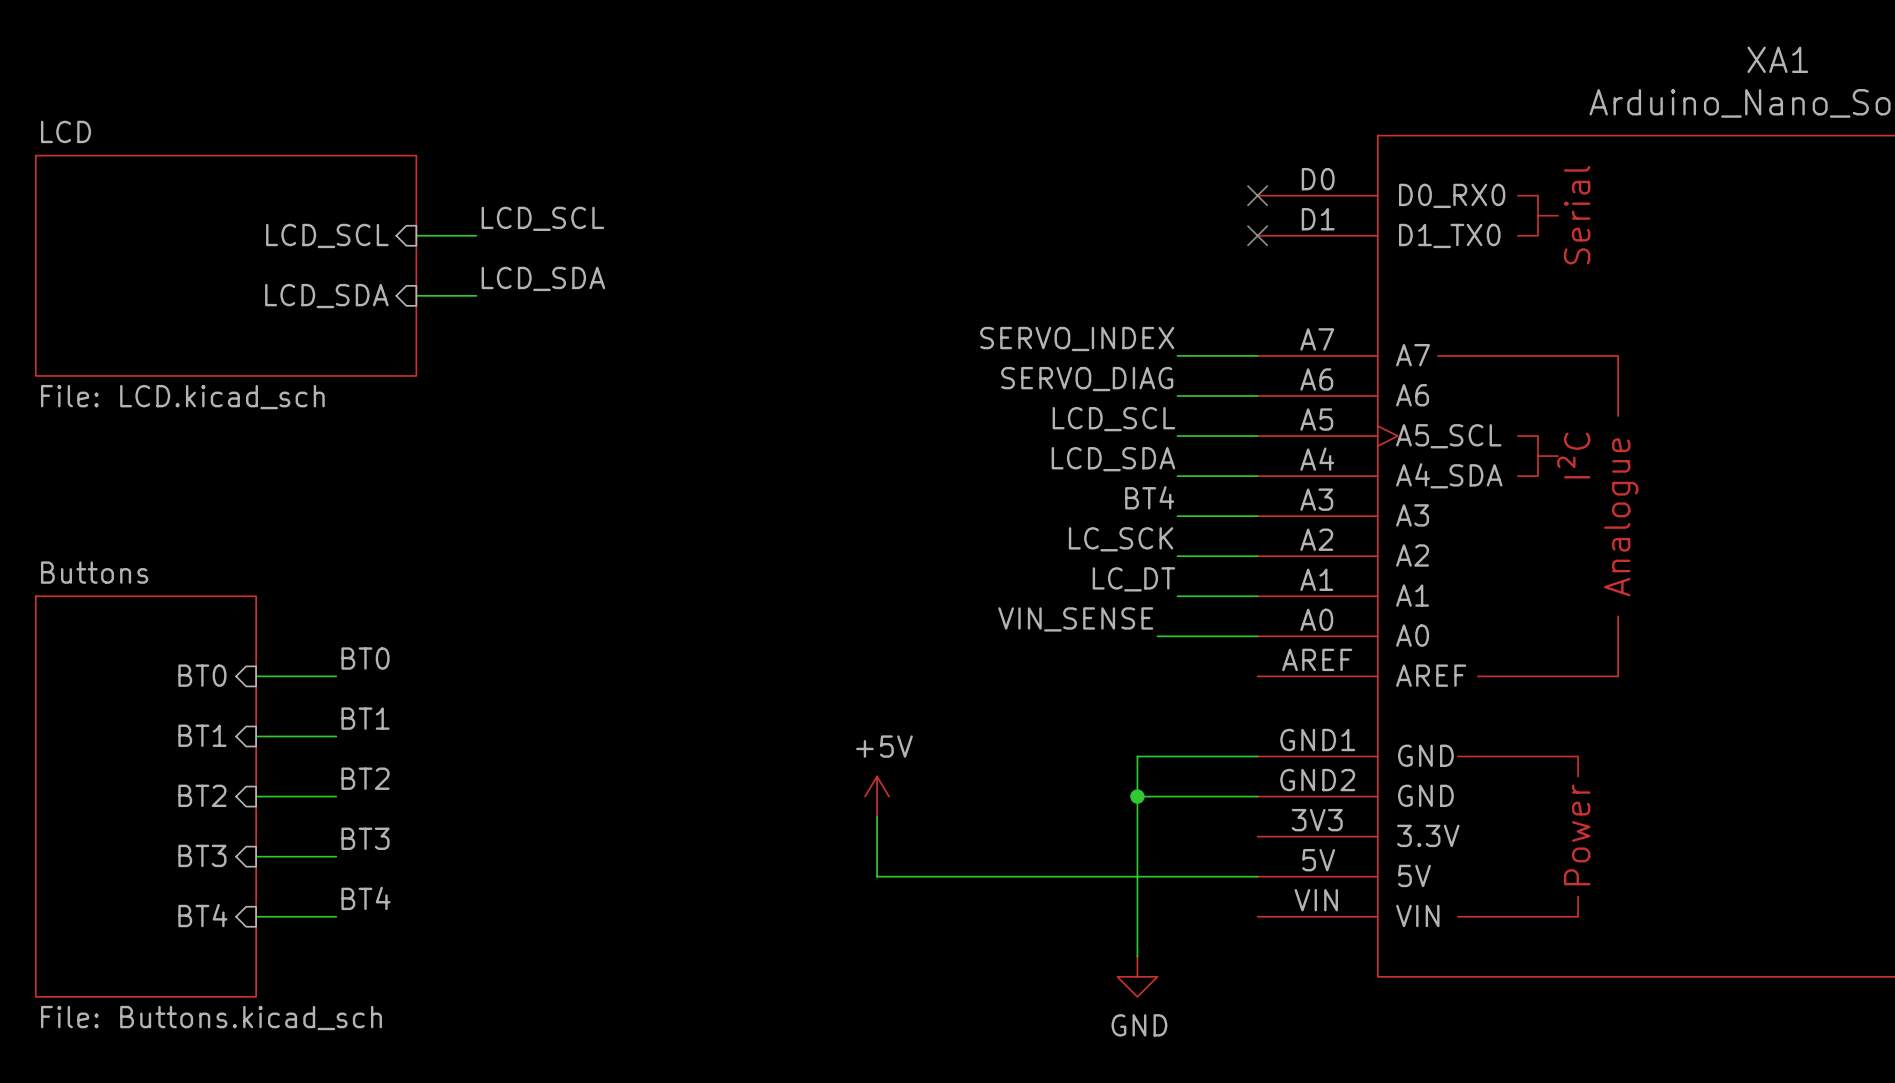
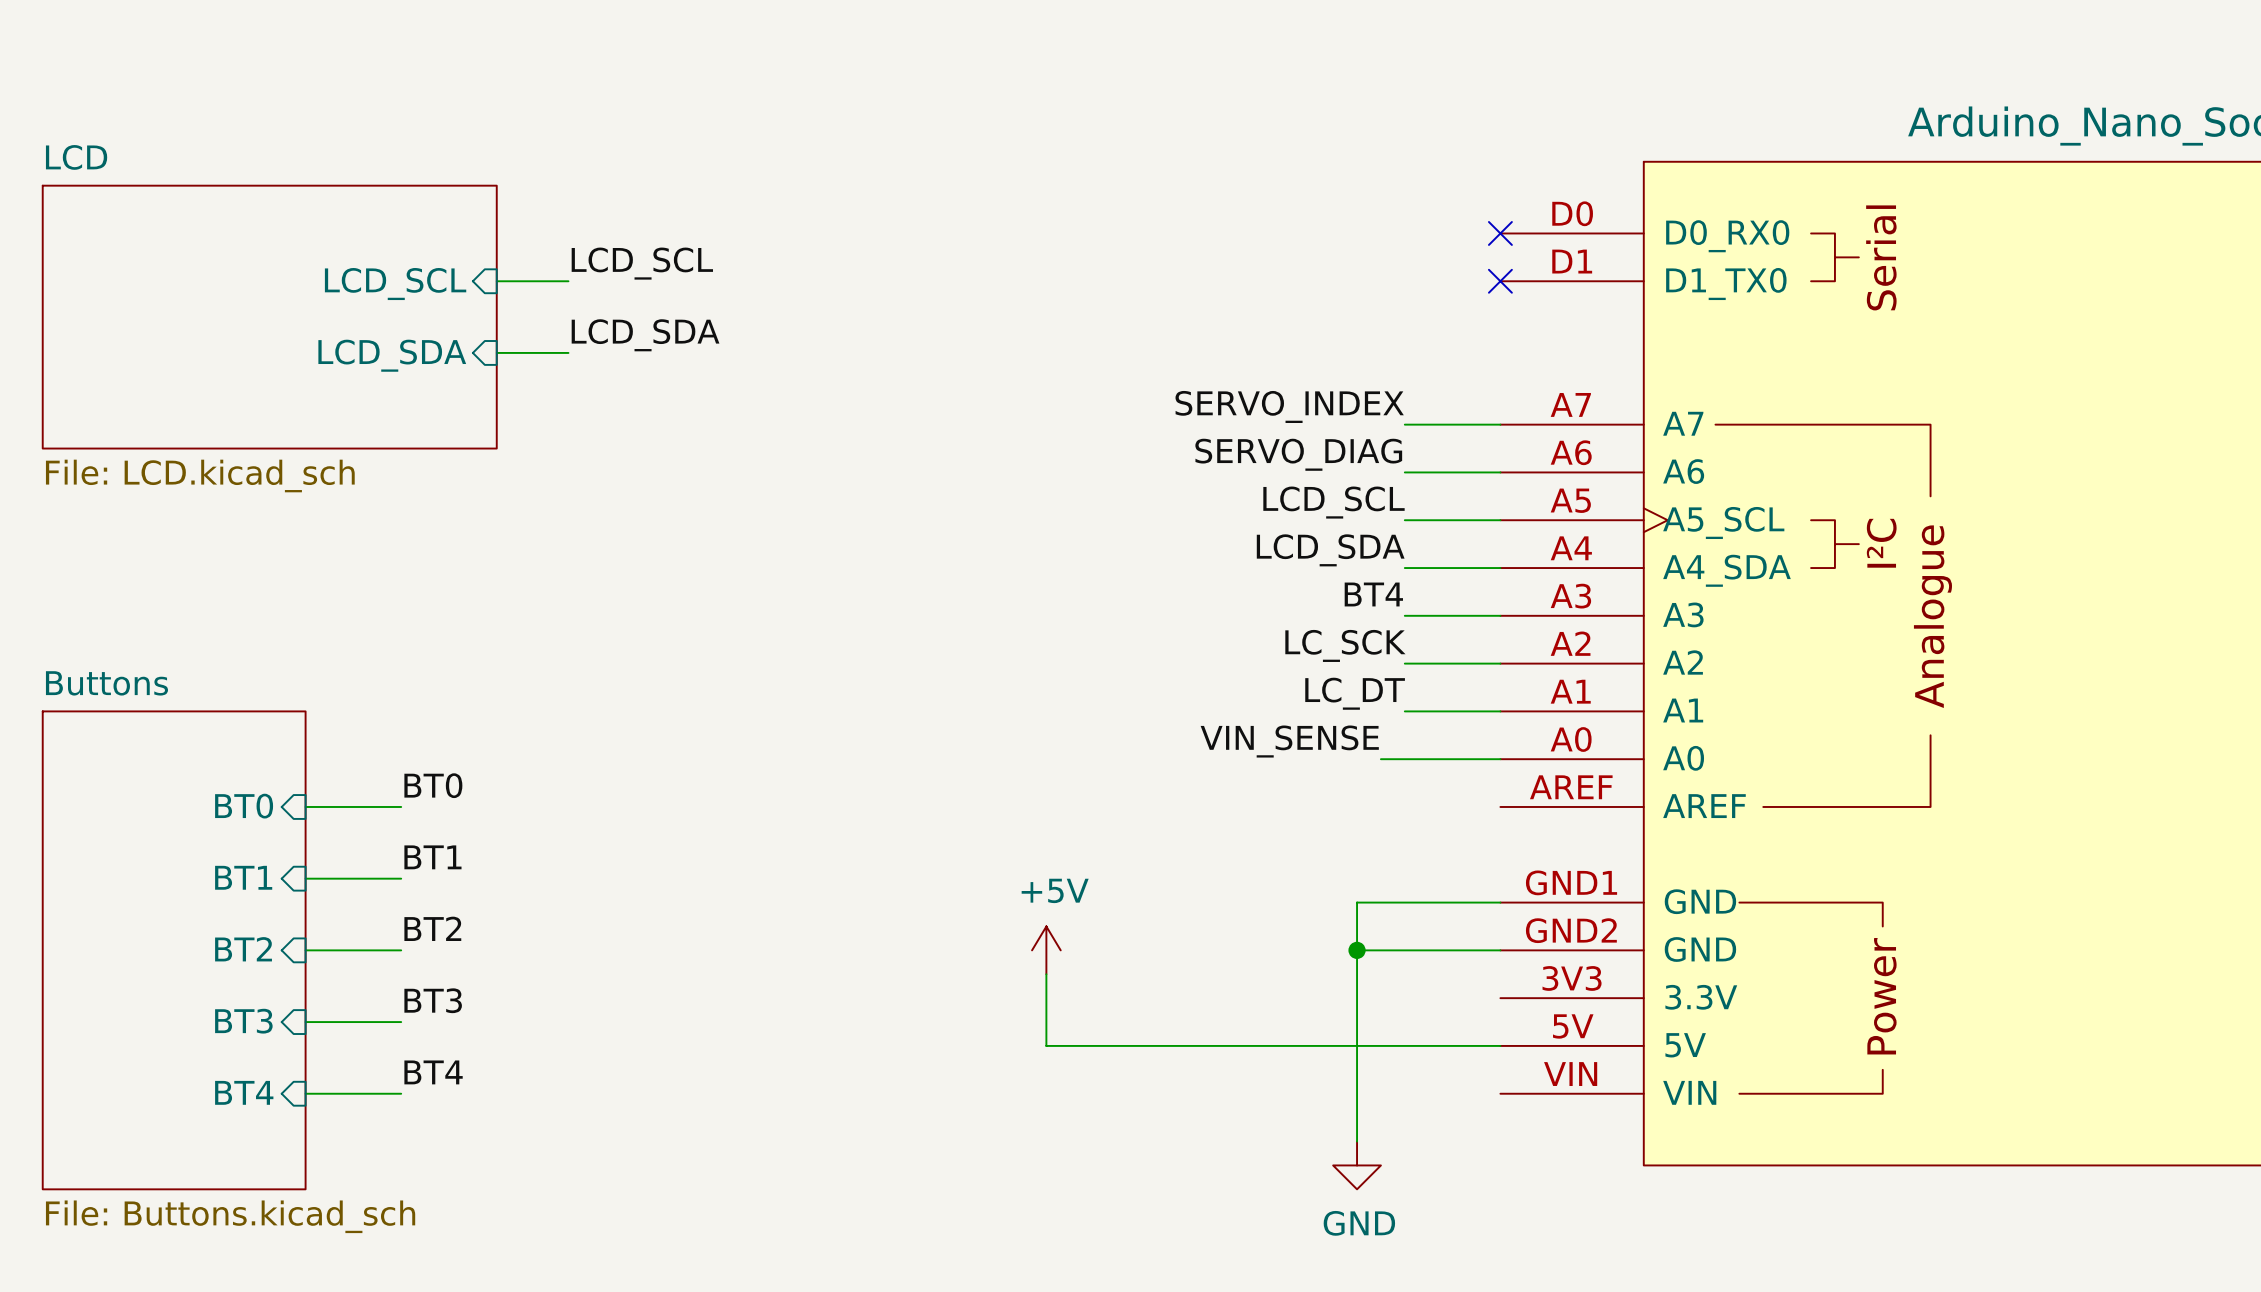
XA1 name: XA1 (1777, 59) -> none

